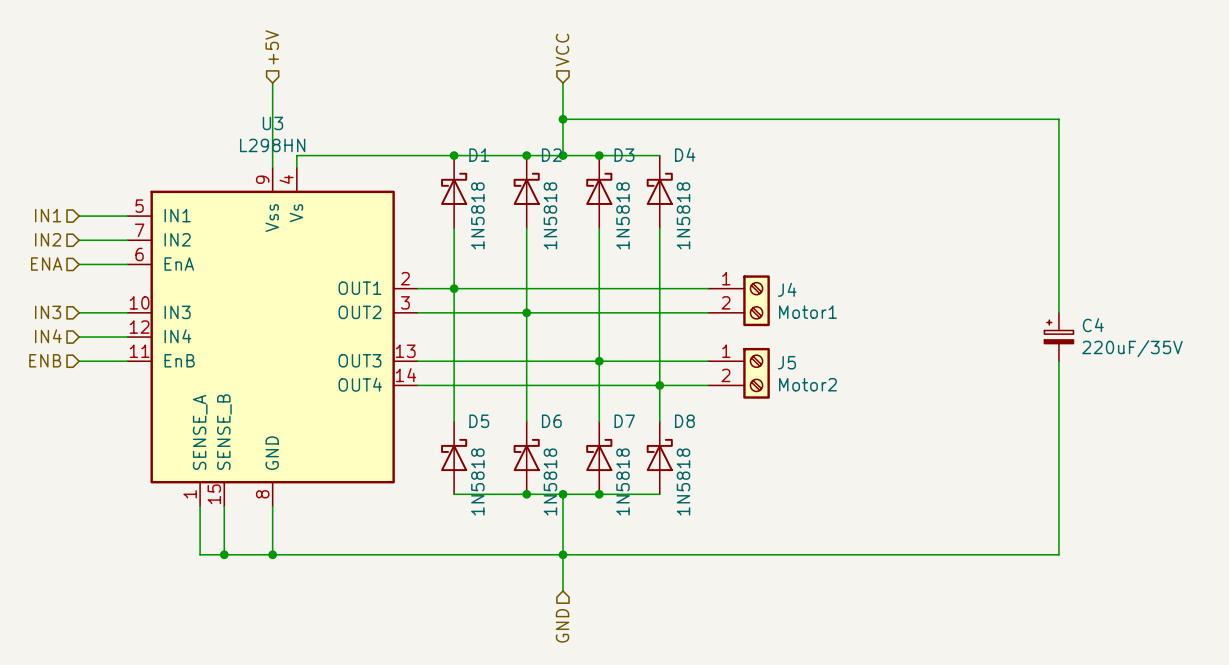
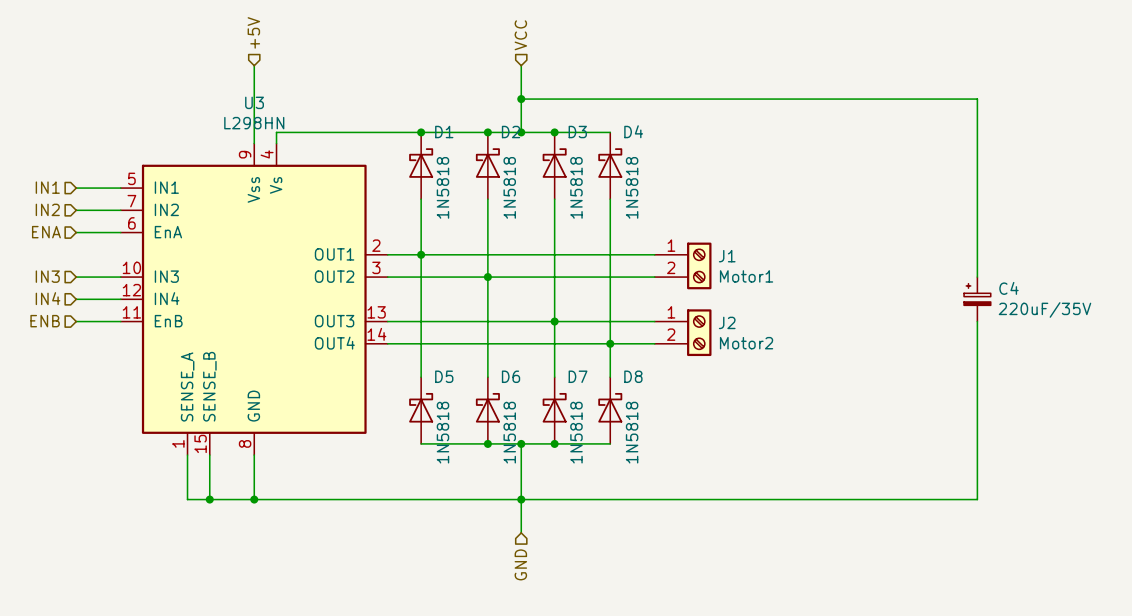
J4 name: J4 (787, 289) -> J1 (727, 256)
J5 name: J5 (786, 362) -> J2 (727, 322)

